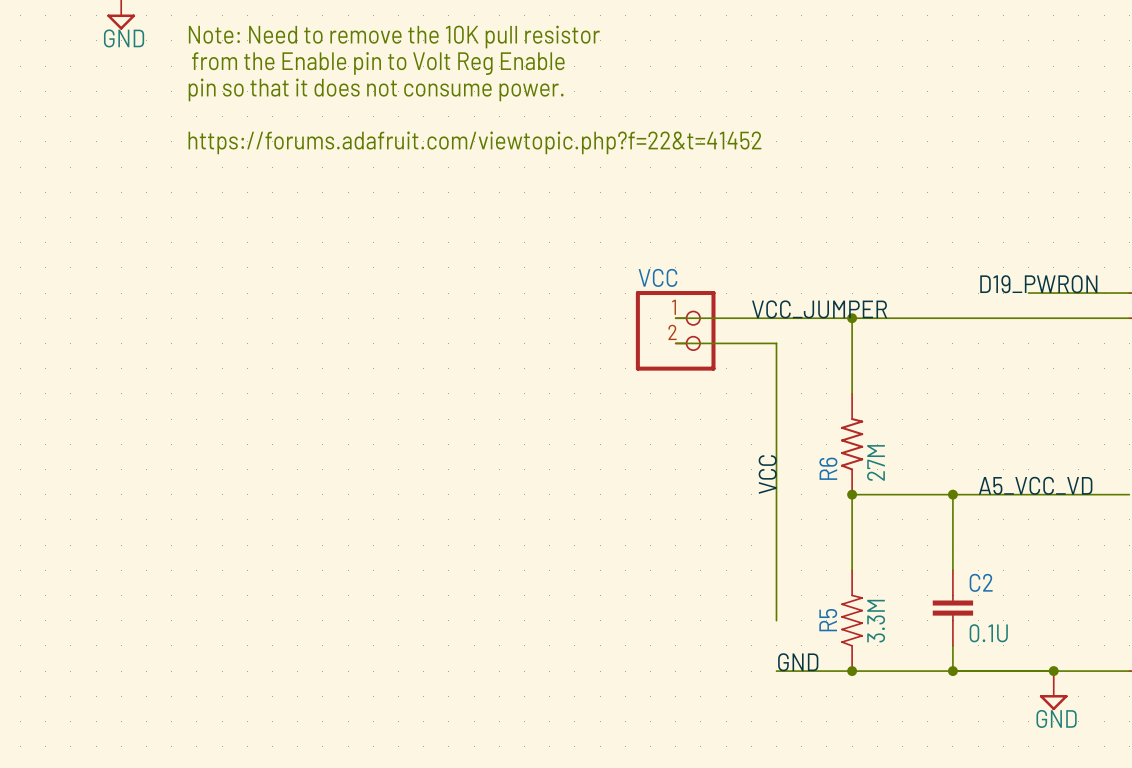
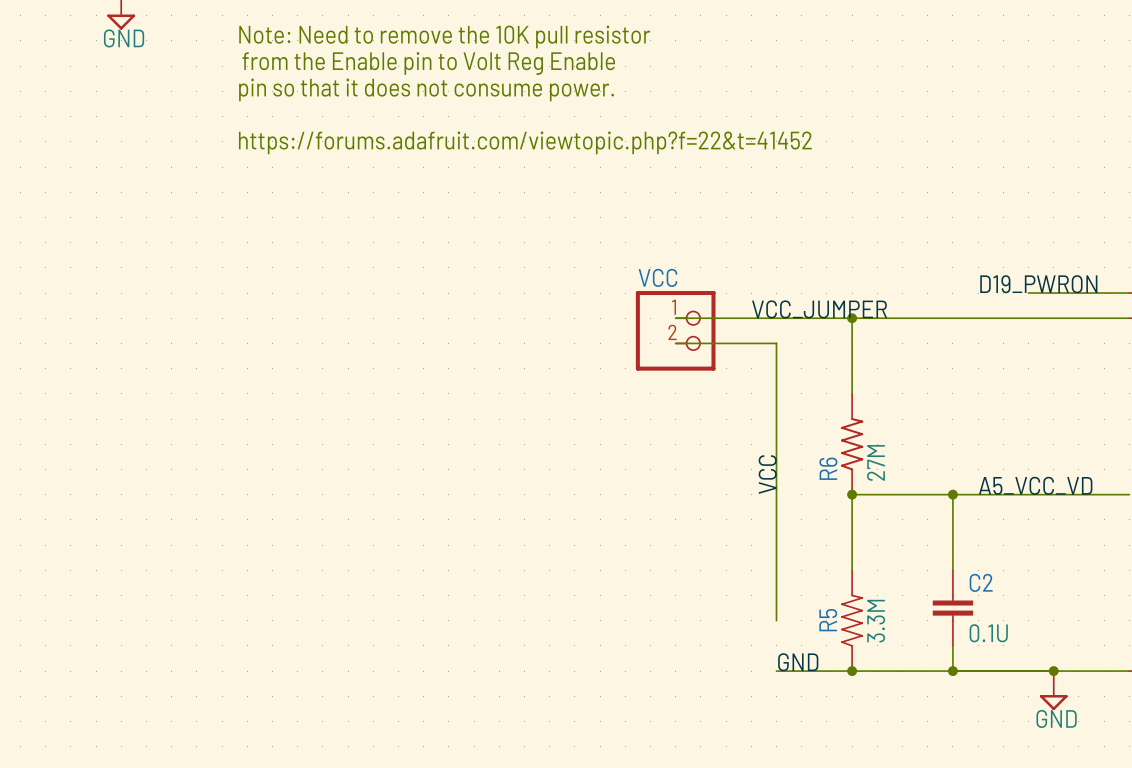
text position: Note: Need to remove the 10K pull resistor (394, 37) -> Note: Need to remove the 10K pull resistor (444, 37)
text position: from the Enable pin to Volt Reg Enable (378, 63) -> from the Enable pin to Volt Reg Enable (428, 63)
text position: pin so that it does not consume power. (376, 89) -> pin so that it does not consume power. (426, 89)
text position: https://forums.adafruit.com/viewtopic.php?f=22&t=41452 (474, 142) -> https://forums.adafruit.com/viewtopic.php?f=22&t=41452 (525, 142)

